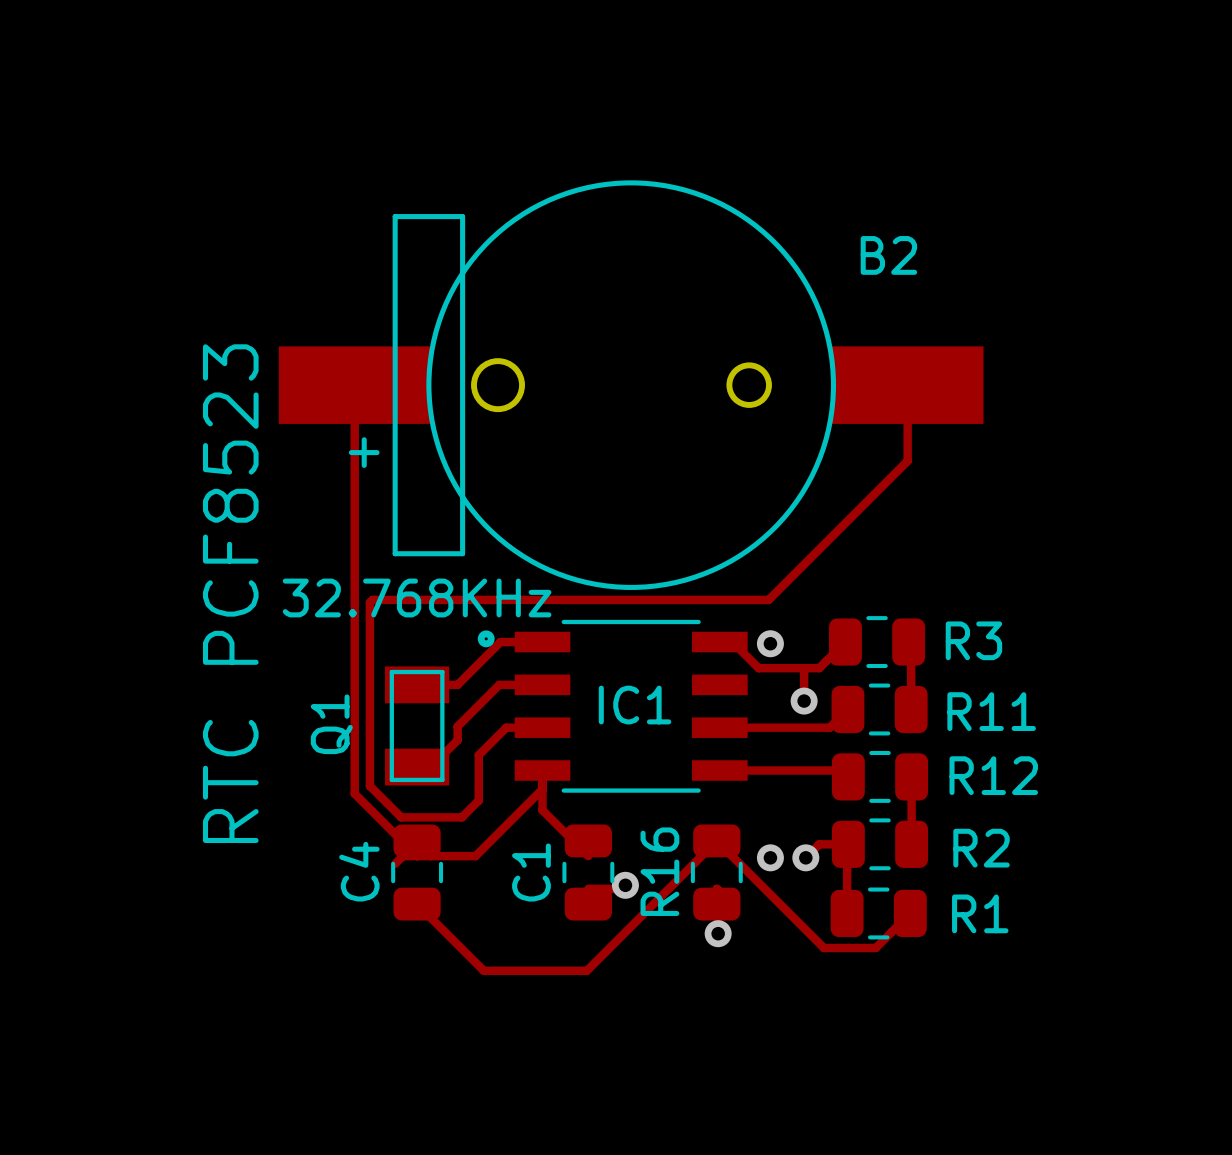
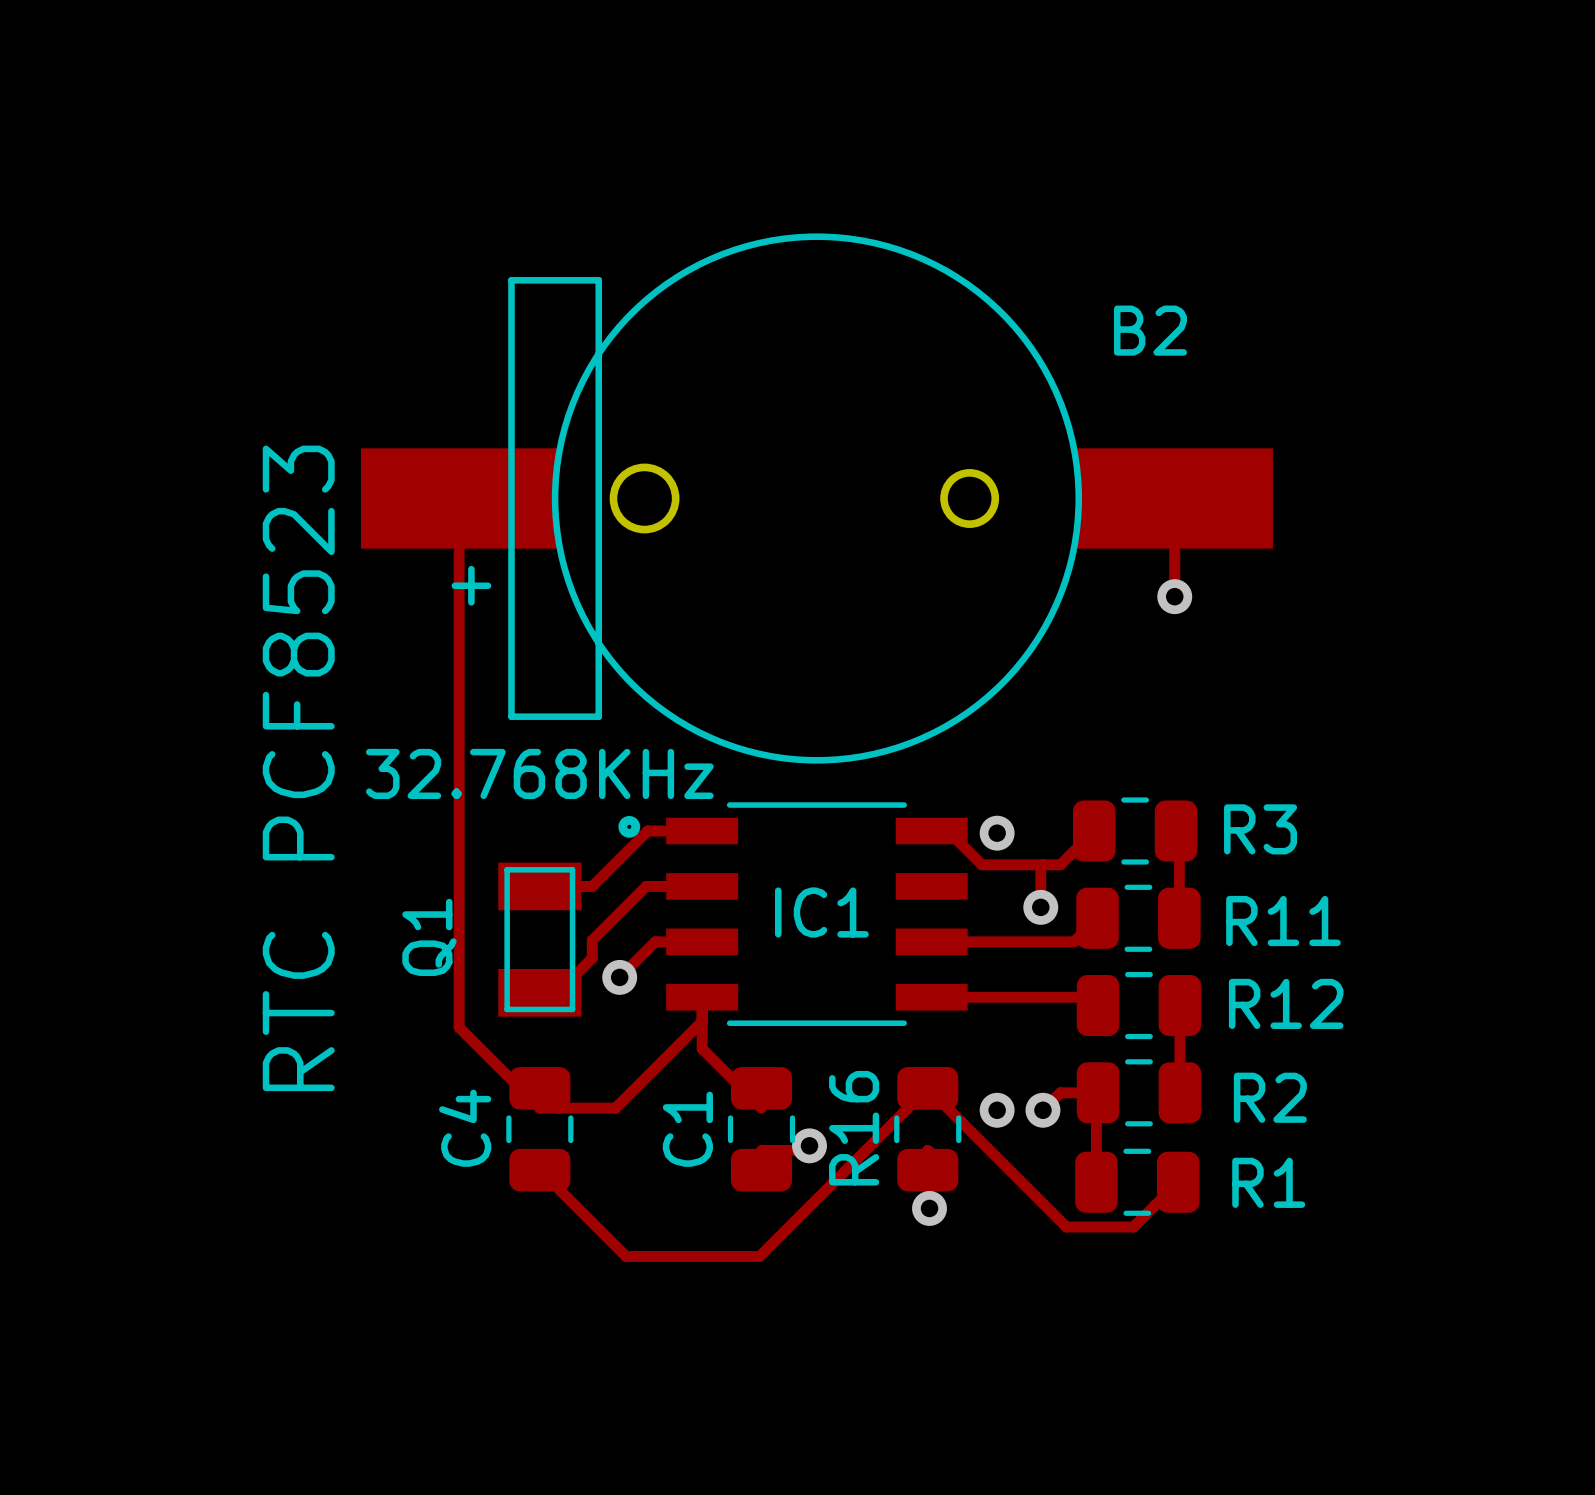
track: (907, 461) (768, 599) (372, 599) (369, 602) (369, 786) (401, 817) (461, 817) (478, 800) (478, 755) -> none
via: none -> (1174, 596)
via: none -> (619, 977)
track: (417, 856) (402, 856) (395, 863) -> none

